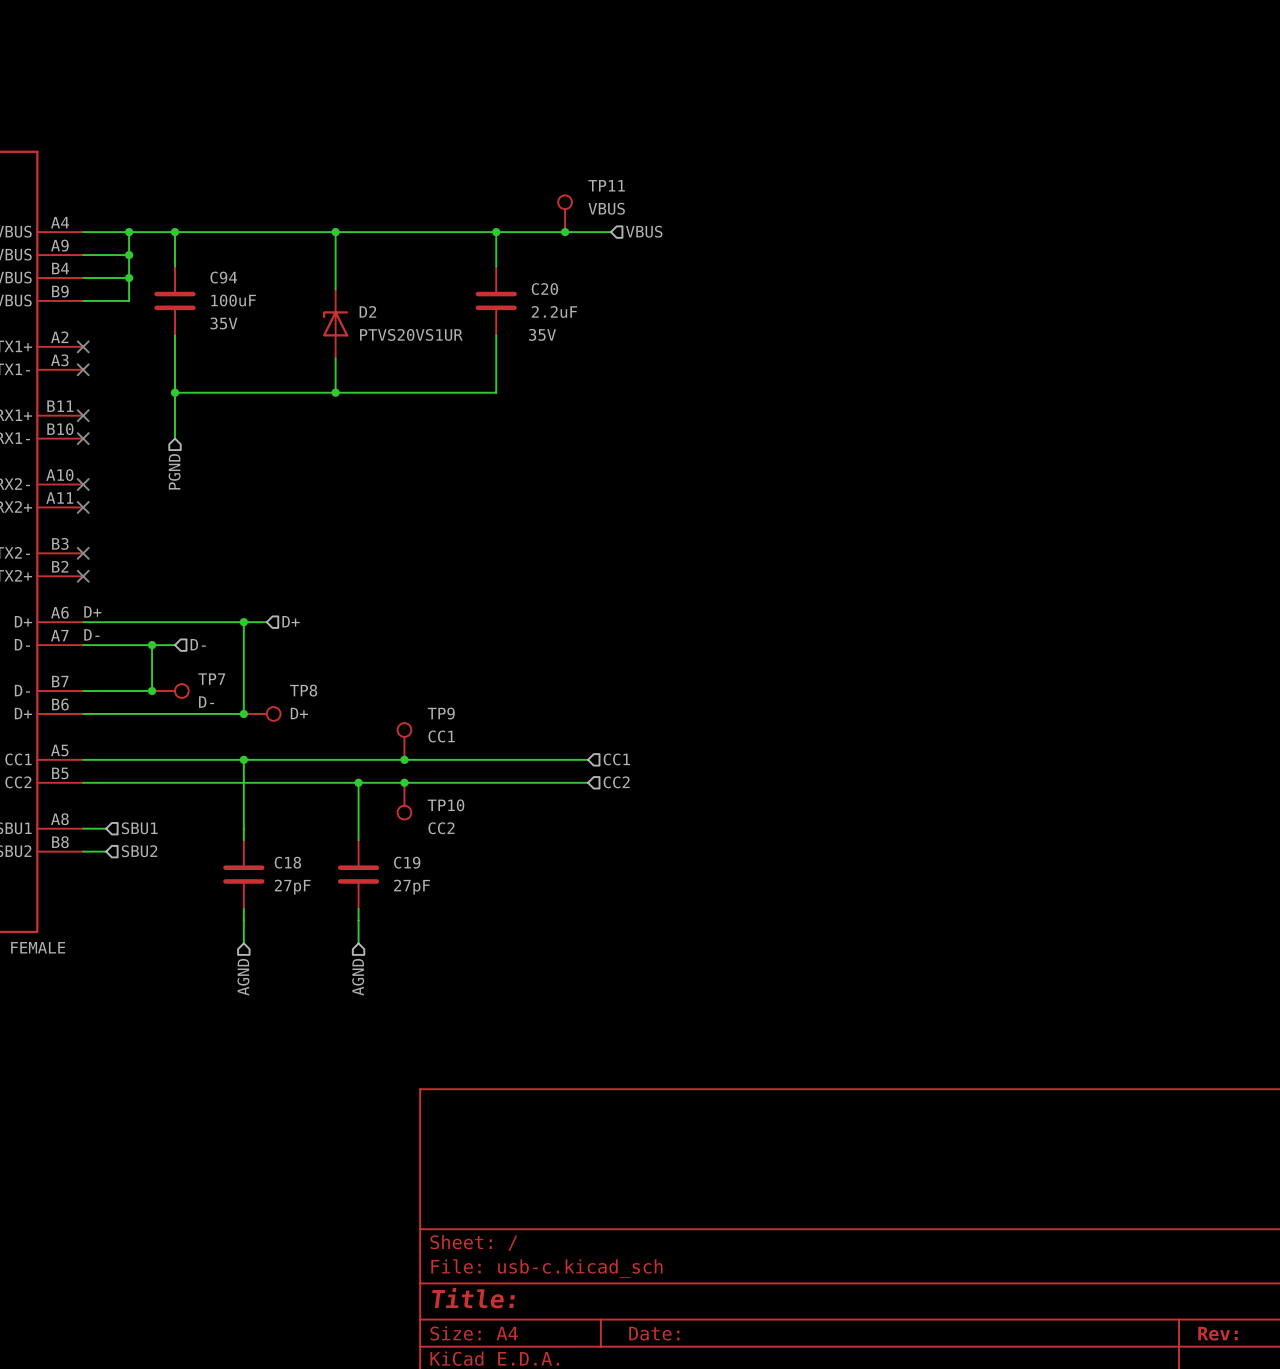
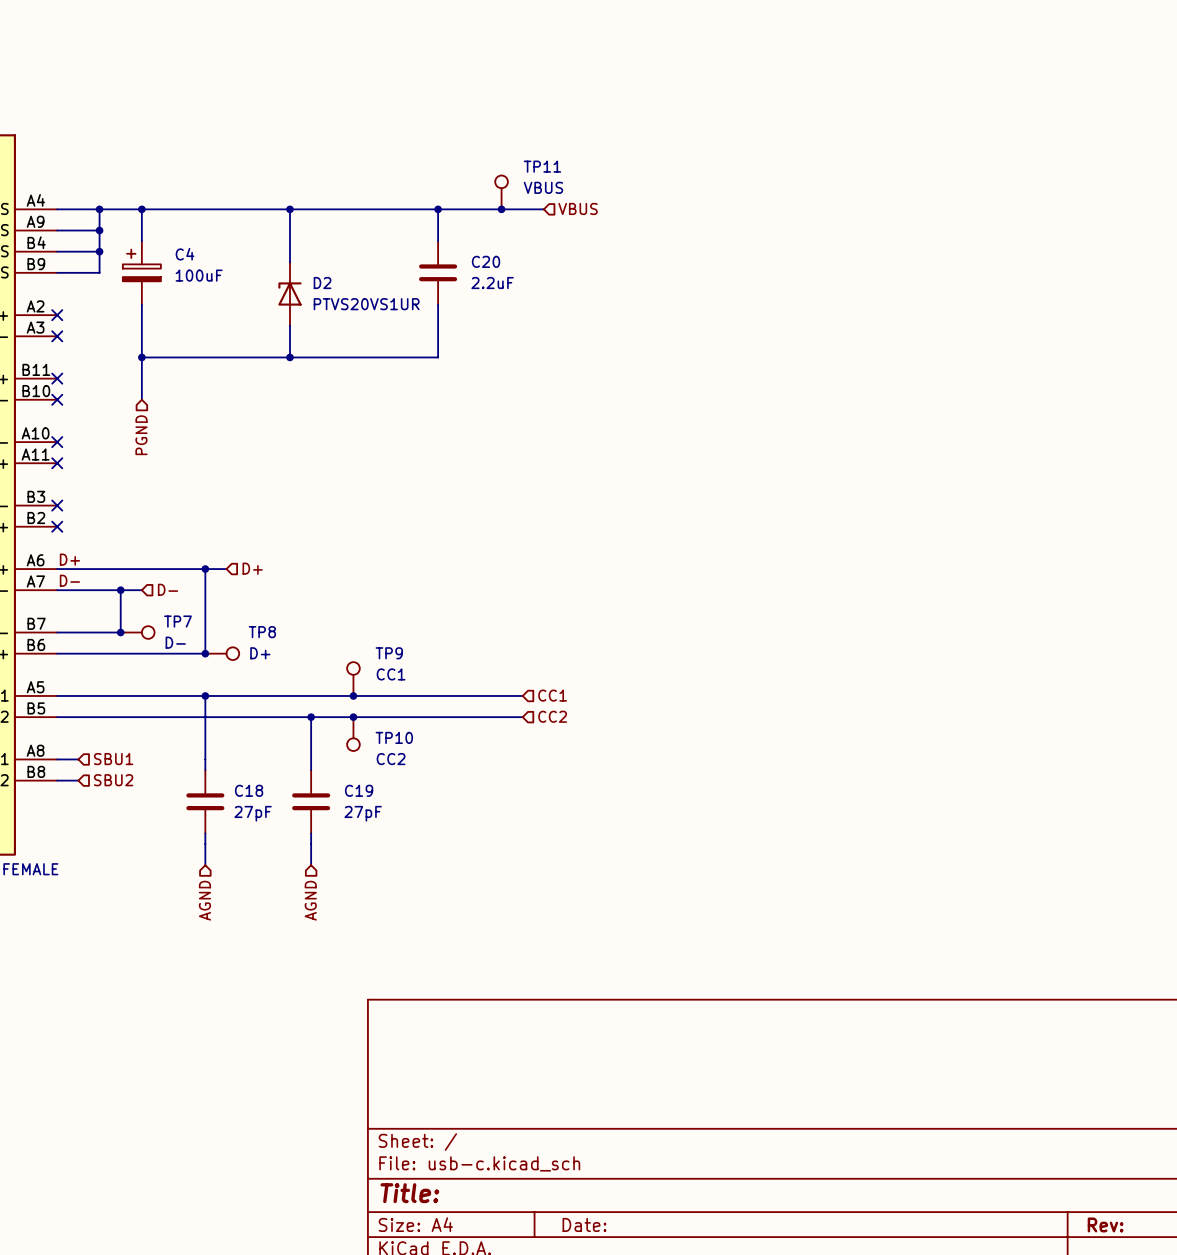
C94: 100uF (175, 300) -> none
C4: none -> 100uF (141, 272)
C20 text: 35V (542, 334) -> none

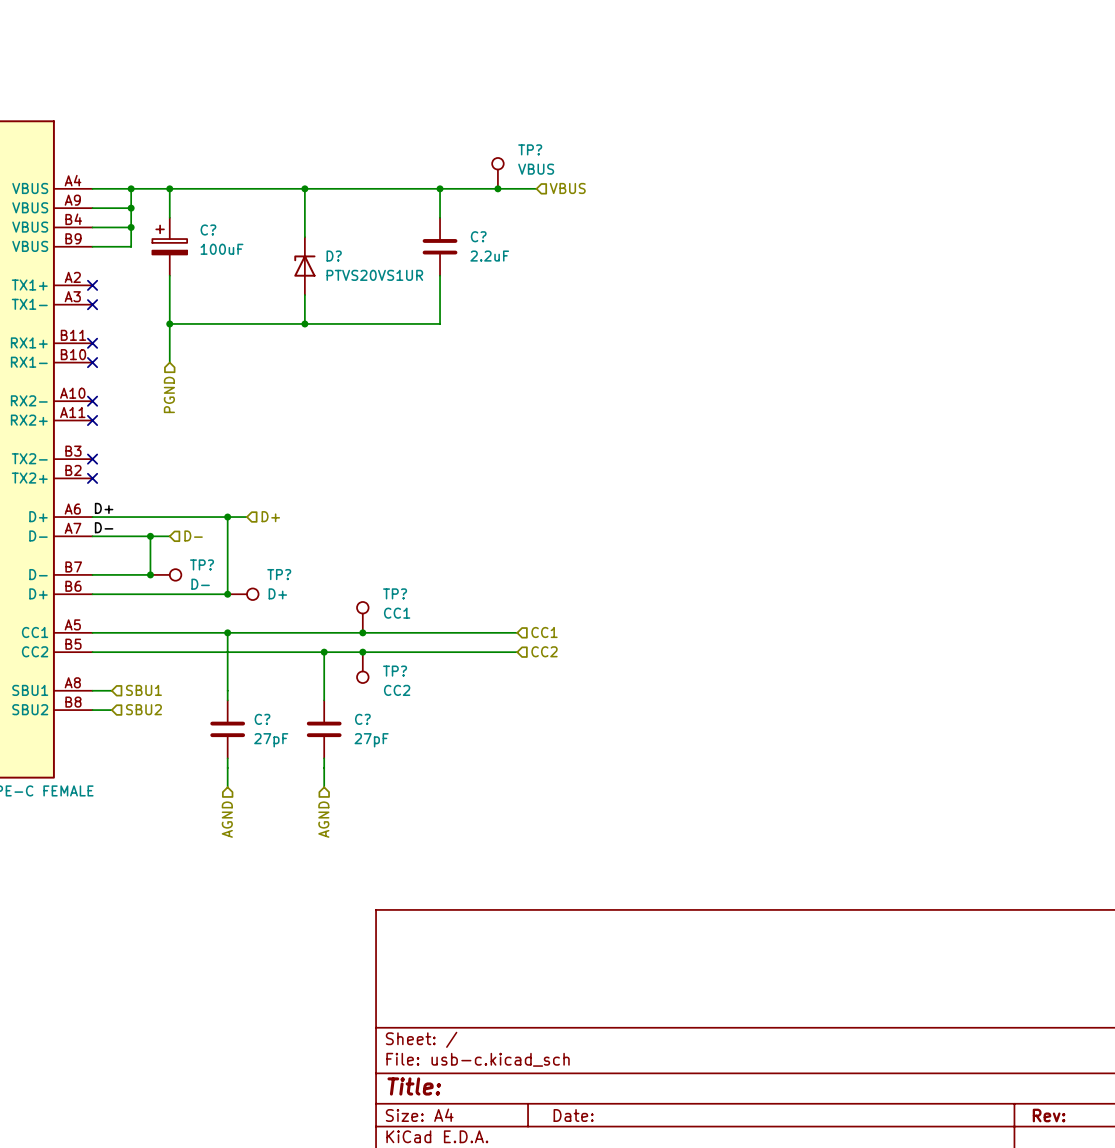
TP11 name: TP11 (542, 166) -> TP? (530, 149)
C4 name: C4 (185, 254) -> C? (208, 229)
C20 name: C20 (486, 261) -> C? (478, 236)
D2 name: D2 (322, 283) -> D? (334, 256)
TP7 name: TP7 (177, 621) -> TP? (202, 564)
TP8 name: TP8 (262, 632) -> TP? (279, 574)
TP9 name: TP9 (389, 653) -> TP? (395, 593)
TP10 name: TP10 (394, 737) -> TP? (395, 671)
C18 name: C18 (249, 790) -> C? (262, 719)
C19 name: C19 (359, 790) -> C? (362, 719)

